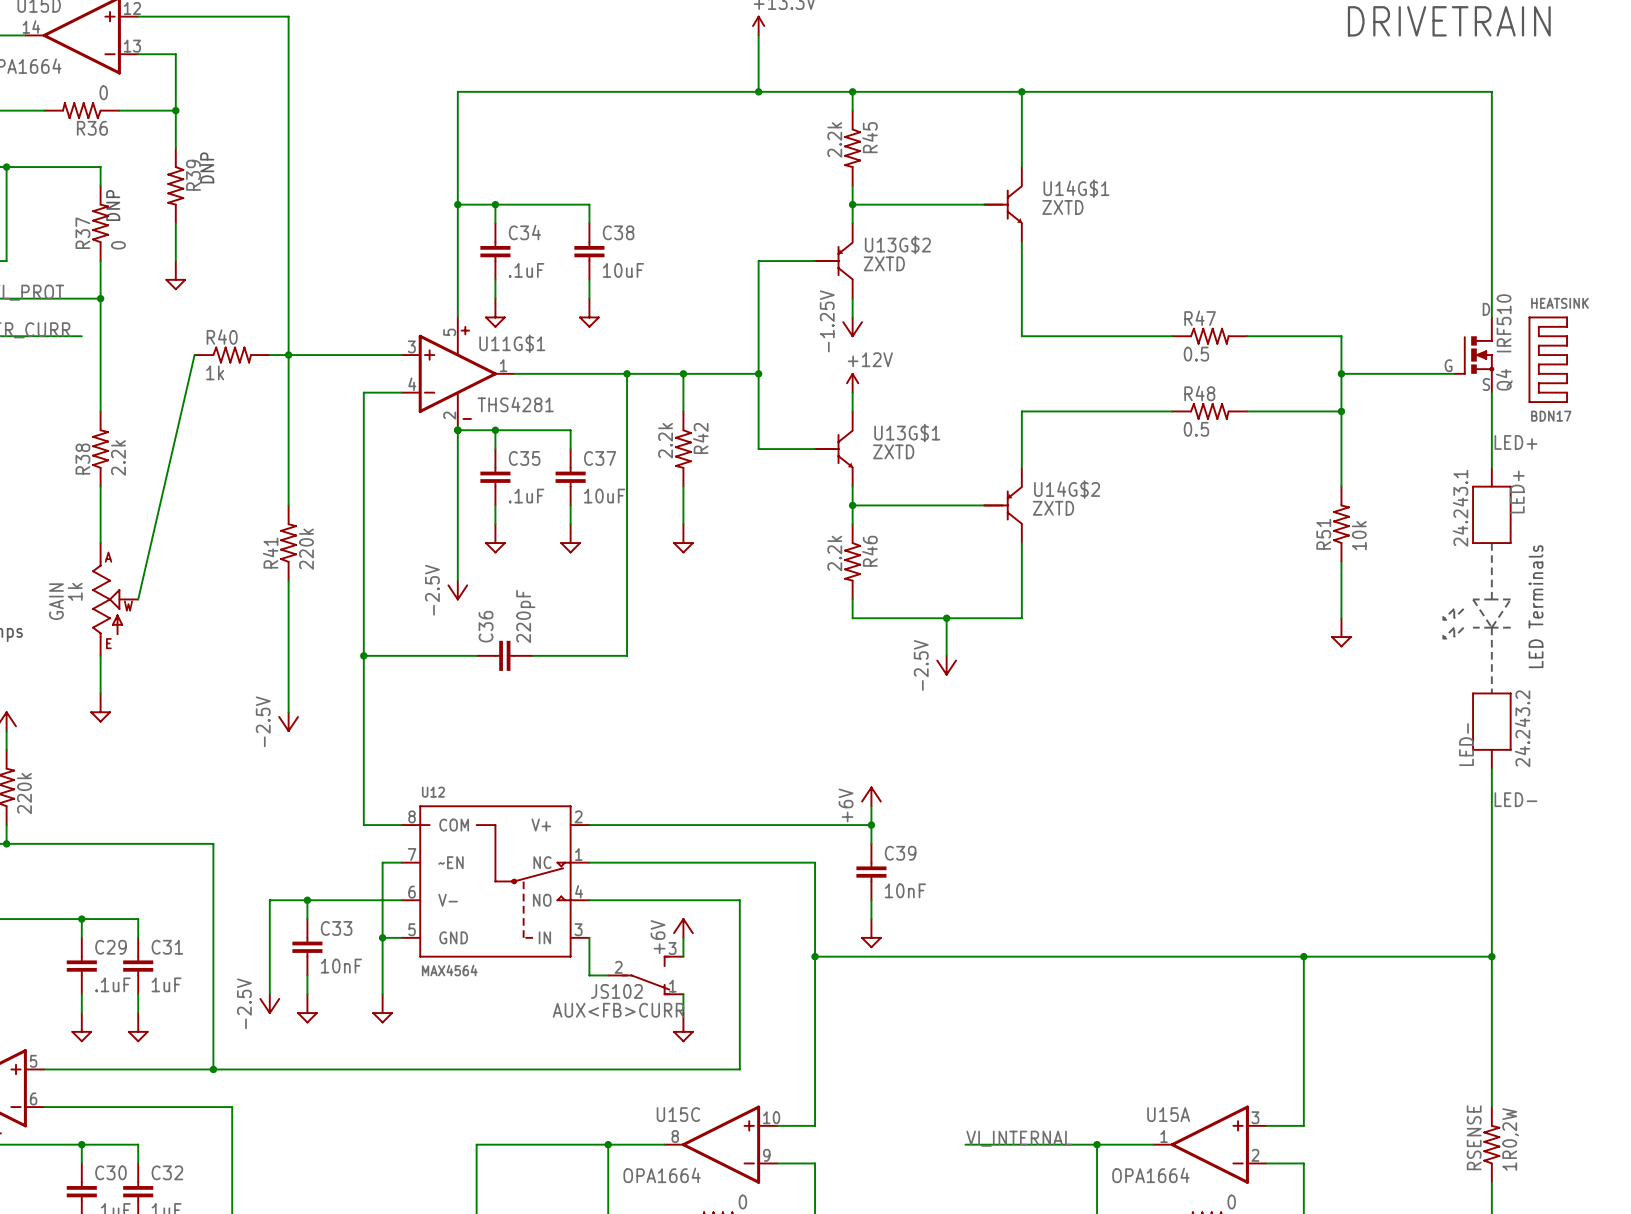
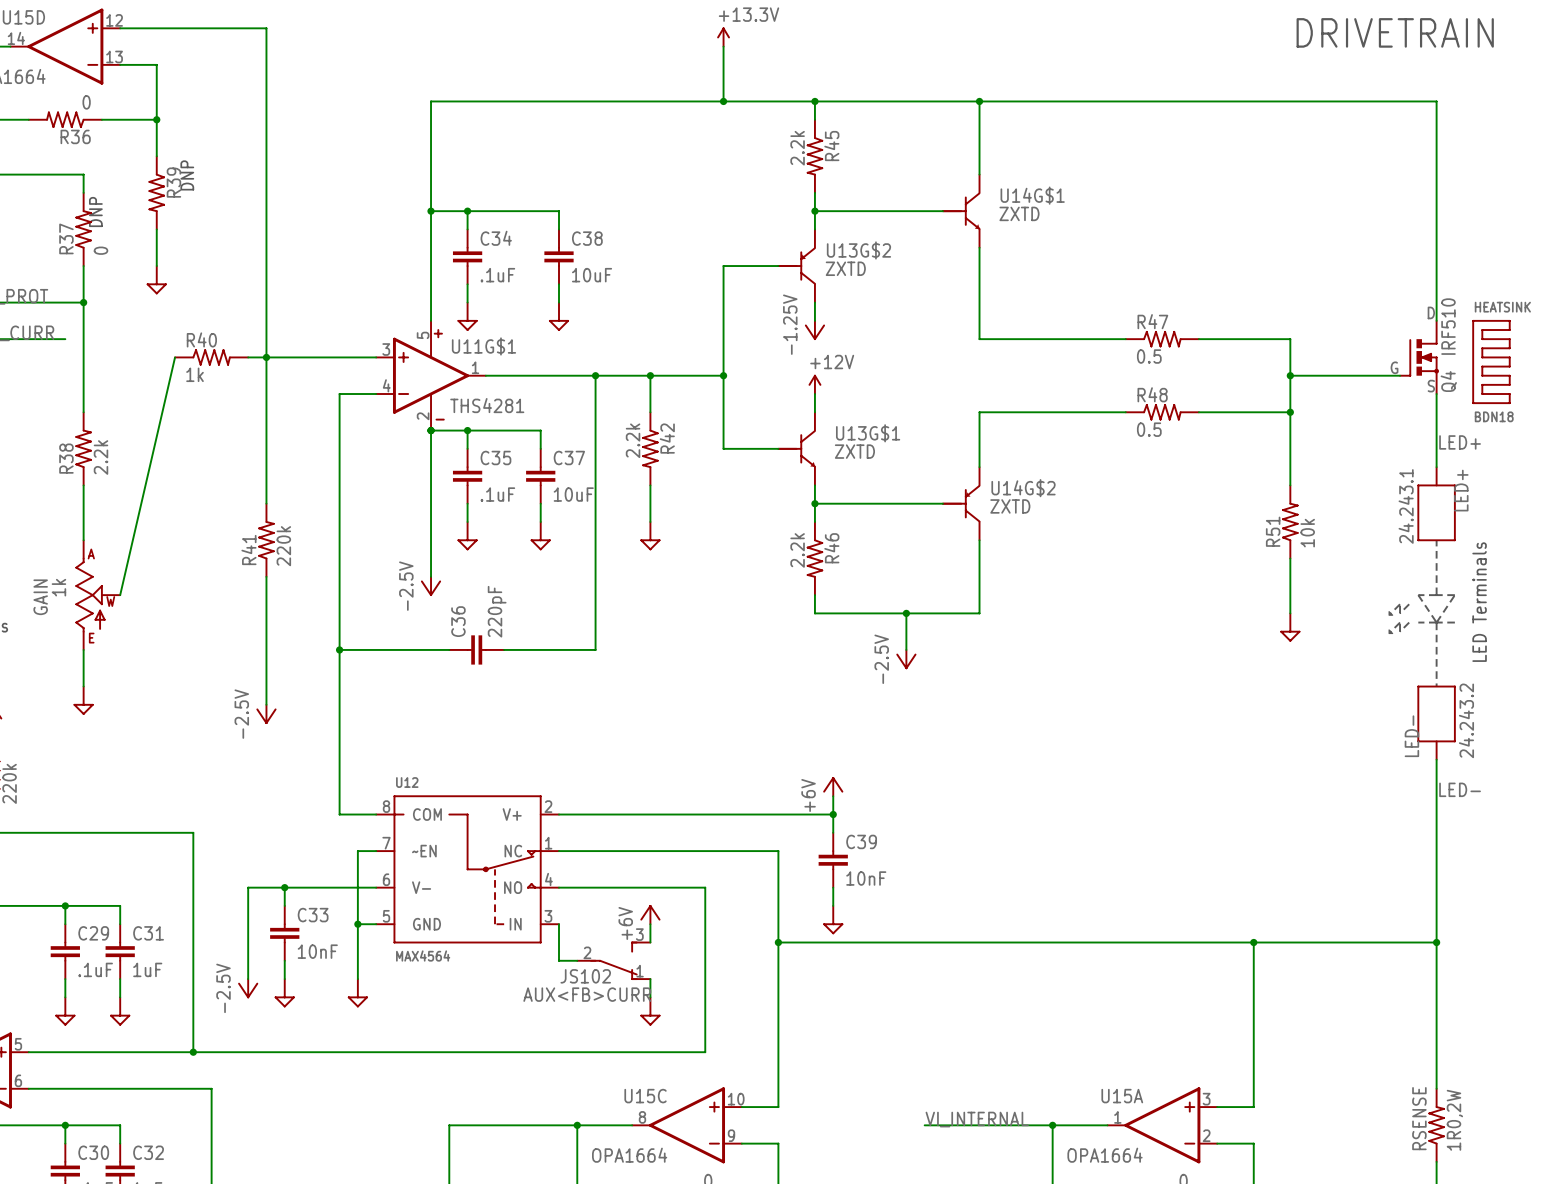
HEATSINK value: BDN17 (1551, 416) -> BDN18 (1494, 416)

